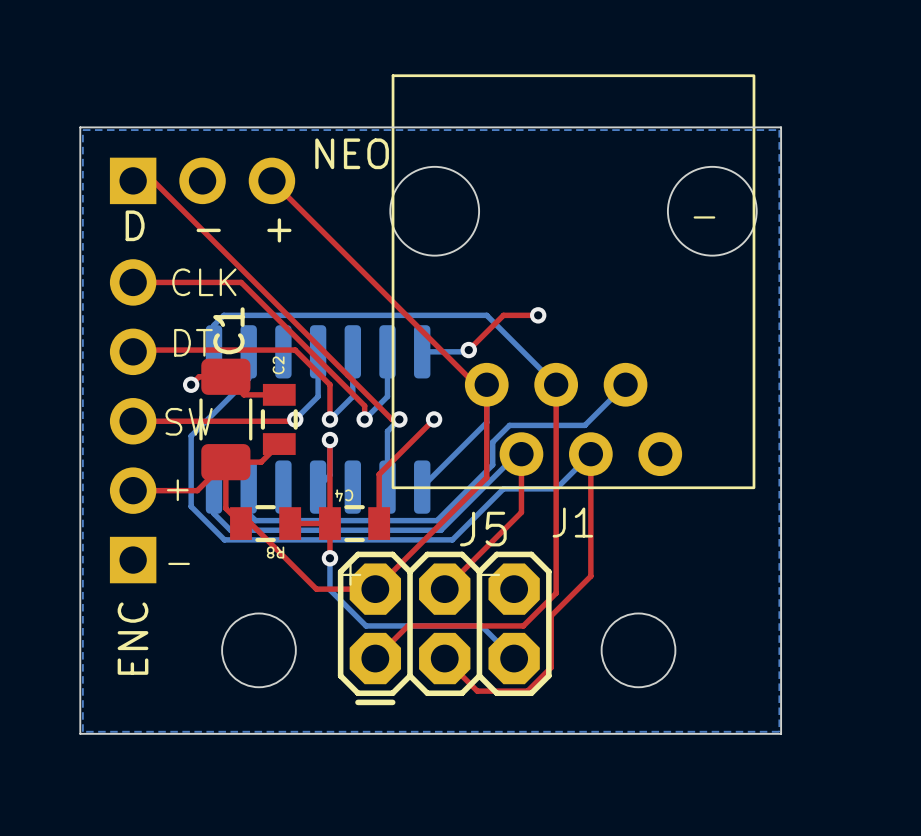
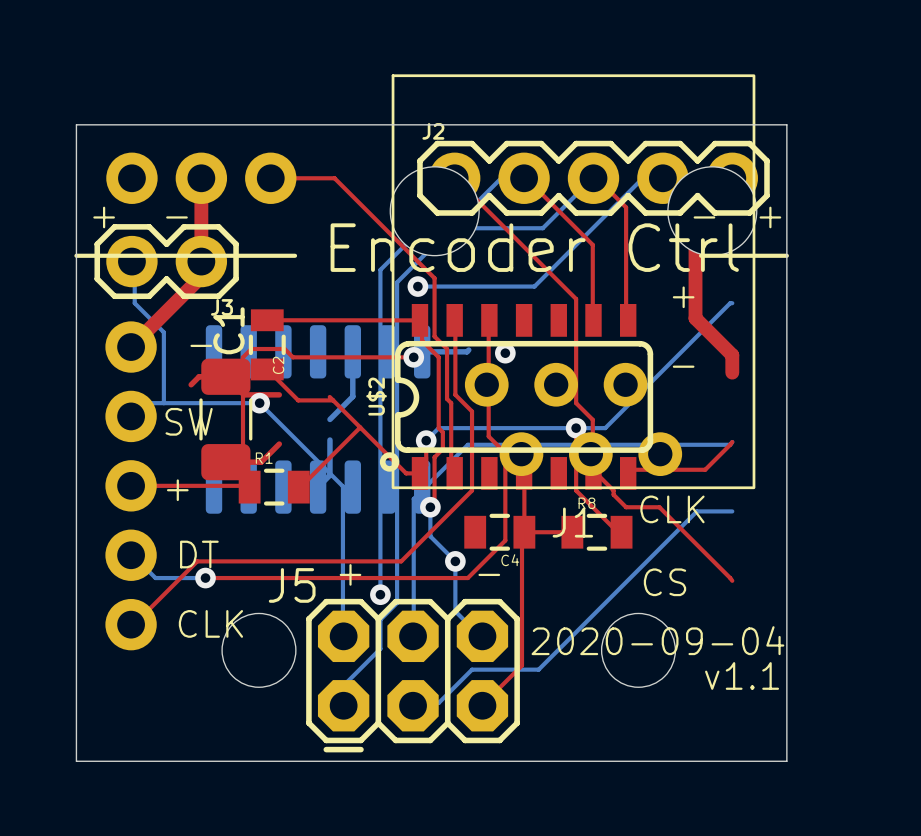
board edge: (80, 127) (781, 127) (781, 733) (80, 733) (80, 127) -> (76, 124) (76, 761) (786, 761) (786, 124) (76, 124)
bottom zone outline: (82, 130) (82, 731) (779, 731) (779, 130) (82, 130) -> none
text: NEO (352, 153) -> none
part footprint: [109, 157, 296, 205] -> [106, 152, 297, 204]
top track: none -> (201, 178) (201, 276) (131, 347)
top track: none -> (270, 178) (334, 178) (434, 278) (434, 336) (447, 349) (447, 398) (451, 403) (451, 469) (454, 473)
top track: none -> (454, 178) (576, 299) (576, 403) (592, 419) (593, 473) (596, 473) (613, 490) (613, 494) (626, 507) (659, 507) (732, 580)
top track: none -> (524, 178) (592, 244) (593, 320)
bottom track: none -> (524, 178) (501, 178) (459, 219) (430, 219) (380, 269) (380, 594)
top track: none -> (593, 178) (596, 178) (626, 207) (626, 319) (628, 320)
bottom track: none -> (593, 178) (542, 228) (451, 228) (397, 282) (397, 603) (380, 619) (380, 648) (347, 682) (347, 702) (343, 705)
J2: none -> (593, 178)
top track: none -> (662, 178) (695, 210) (695, 318) (732, 355) (732, 372)
bottom track: none -> (662, 178) (642, 178) (534, 286) (417, 286)
top track: (133, 180) (153, 180) (391, 419) (399, 419) -> none
top track: (271, 180) (475, 384) (486, 384) (486, 477) (375, 589) (316, 589) (250, 523) (240, 523) (225, 508) (225, 462) (197, 490) (133, 490) -> none
text: none -> + (770, 217)
text: D (135, 225) -> none
text position: - (208, 230) -> - (176, 217)
text position: + (279, 230) -> + (104, 217)
text: none -> Encoder Ctrl (534, 247)
line: none -> (76, 255) (295, 255)
line: none -> (701, 255) (786, 255)
bottom track: none -> (131, 261) (134, 261) (134, 303) (163, 332) (163, 403)
J3: none -> (166, 261)
top track: (133, 282) (241, 282) (364, 405) (364, 419) -> none
text: CLK (204, 282) -> none
via: none -> (417, 286)
text: none -> + (683, 297)
bottom track: none -> (732, 303) (605, 428) (438, 428) (426, 440)
top track: (538, 315) (503, 315) (468, 350) -> none
via: (538, 315) -> none
top track: none -> (267, 320) (419, 320) (422, 324) (422, 340) (438, 357) (438, 428) (442, 432) (442, 448) (434, 457) (434, 503) (430, 507)
top track: none -> (454, 320) (455, 394) (472, 411) (472, 490) (401, 561) (197, 561) (134, 623) (131, 624)
top track: none -> (489, 320) (488, 436) (505, 453) (505, 540) (467, 578) (205, 578)
text position: DT (193, 342) -> DT (199, 554)
text: none -> - (201, 345)
via: (468, 350) -> none
top track: (133, 351) (134, 350) (295, 350) (329, 384) (329, 419) -> none
bottom track: (214, 351) (214, 325) (223, 315) (486, 315) (556, 384) -> none
bottom track: (248, 351) (248, 378) (191, 436) (191, 506) (224, 539) (452, 539) (503, 488) (556, 488) (590, 454) -> none
bottom track: (318, 351) (318, 396) (295, 419) -> none
bottom track: (387, 351) (387, 396) (364, 419) -> none
via: none -> (505, 353)
top track: none -> (413, 357) (292, 357) (284, 349) (251, 349) (243, 357) (243, 486) (249, 487) (131, 485)
via: none -> (413, 357)
text: none -> - (683, 366)
top track: none -> (267, 369) (298, 400) (333, 400)
via: (191, 384) -> none
bottom track: (486, 384) (486, 422) (422, 487) -> none
top track: (556, 384) (556, 593) (523, 625) (407, 625) (375, 658) -> none
bottom track: (625, 384) (584, 425) (509, 425) (492, 442) (492, 464) (437, 520) (255, 520) (248, 513) (248, 487) -> none
top track: none -> (329, 396) (406, 473) (419, 473) (426, 465) (426, 440)
U$2: none -> (516, 396)
via: none -> (259, 403)
bottom track: none -> (131, 416) (134, 415) (147, 403) (259, 403) (342, 486) (343, 636)
C2 position: (279, 419) -> (267, 344)
top track: (295, 419) (293, 421) (133, 421) -> none
via: (295, 419) -> none
via: (329, 419) -> none
via: (364, 419) -> none
bottom track: (399, 419) (387, 431) (387, 487) -> none
via: (399, 419) -> none
top track: (434, 419) (379, 474) (379, 523) -> none
via: (434, 419) -> none
part: (133, 421) -> none
top track: none -> (360, 427) (298, 487)
top track: none -> (576, 428) (576, 490) (617, 532) (621, 532)
via: none -> (576, 428)
top track: (329, 440) (329, 558) -> none
via: (329, 440) -> none
via: none -> (426, 440)
top track: none -> (732, 442) (705, 469) (630, 469) (628, 473)
bottom track: none -> (732, 442) (730, 444) (467, 444) (413, 498) (413, 636)
top track: (521, 454) (521, 512) (444, 589) -> none
bottom track: (521, 454) (517, 454) (441, 530) (230, 530) (214, 513) (214, 487) -> none
top track: (590, 454) (590, 576) (551, 615) (551, 667) (527, 691) (477, 691) (444, 658) -> none
top track: none -> (524, 473) (524, 532)
part: none -> (131, 485)
R1: none -> (274, 487)
C4 name rotation: 0° (344, 495) -> 180° (510, 560)
C4 name position: C4 (344, 495) -> C4 (510, 560)
bottom track: none -> (430, 507) (430, 536) (455, 561) (455, 611) (482, 636)
via: none -> (430, 507)
text: none -> CLK (672, 509)
bottom track: none -> (732, 511) (696, 511) (538, 669) (472, 669) (438, 702) (413, 702) (413, 705)
R8 position: (265, 523) -> (596, 532)
top track: (290, 523) (329, 523) -> none
C4 position: (354, 523) -> (499, 532)
J5 name position: J5 (483, 529) -> J5 (292, 585)
top track: none -> (572, 532) (522, 532) (522, 665) (482, 705)
R8 name rotation: 0° (275, 552) -> 180° (586, 503)
R8 name position: R8 (275, 552) -> R8 (586, 503)
bottom track: none -> (131, 555) (155, 578) (205, 578)
bottom track: (329, 558) (329, 589) (366, 625) (481, 625) (514, 658) -> none
via: (329, 558) -> none
via: none -> (455, 561)
text: - (179, 563) -> none
via: none -> (205, 578)
text: none -> CS (664, 582)
via: none -> (380, 594)
text: none -> CLK (210, 623)
J5 position: (444, 628) -> (413, 675)
text: ENC (133, 638) -> none
text: none -> 2020-09-04 (657, 640)
text: none -> v1.1 (742, 675)

